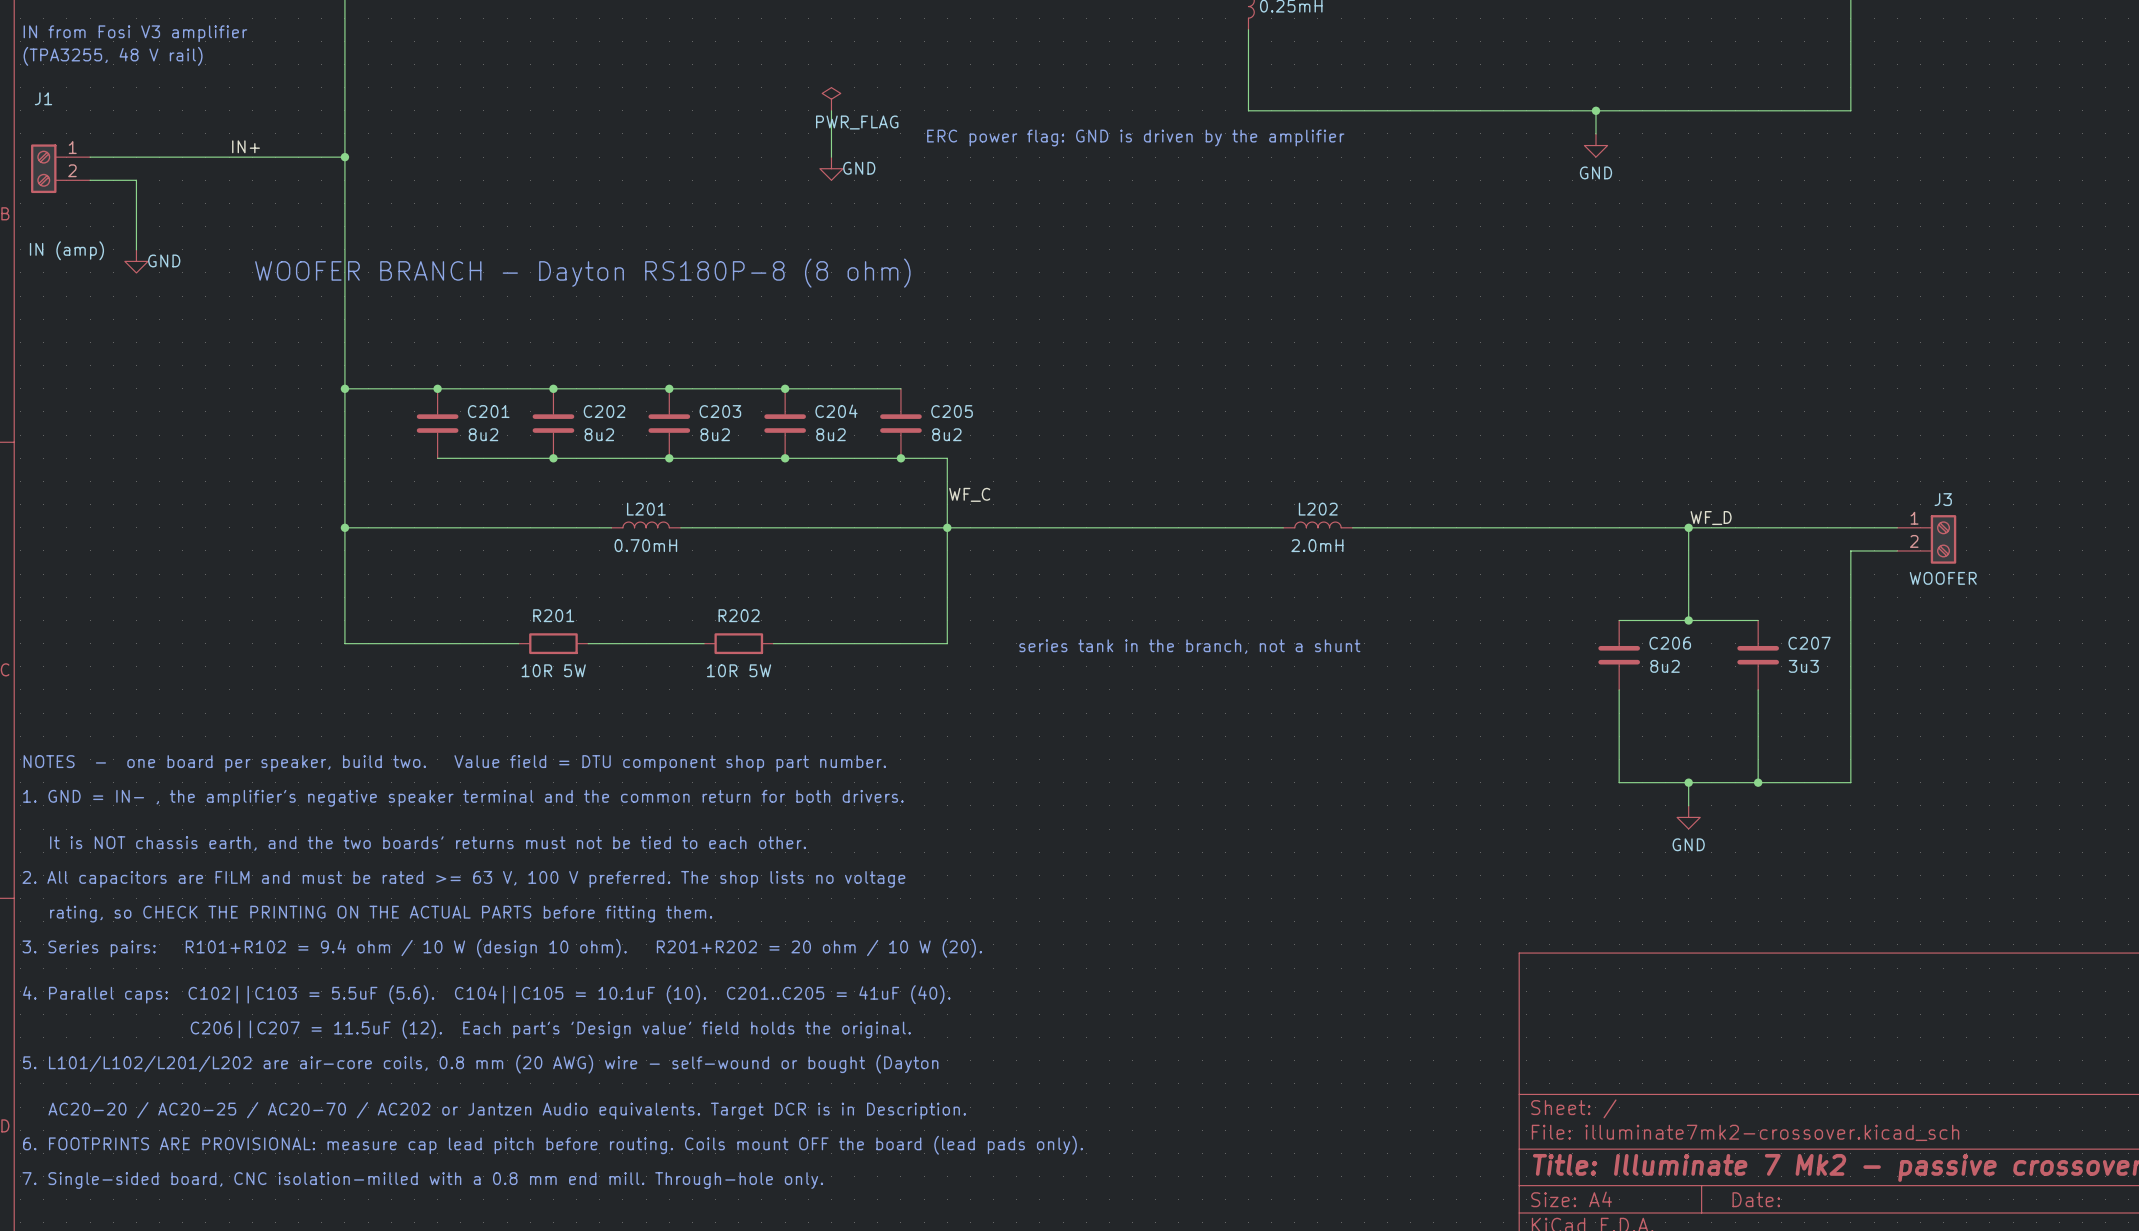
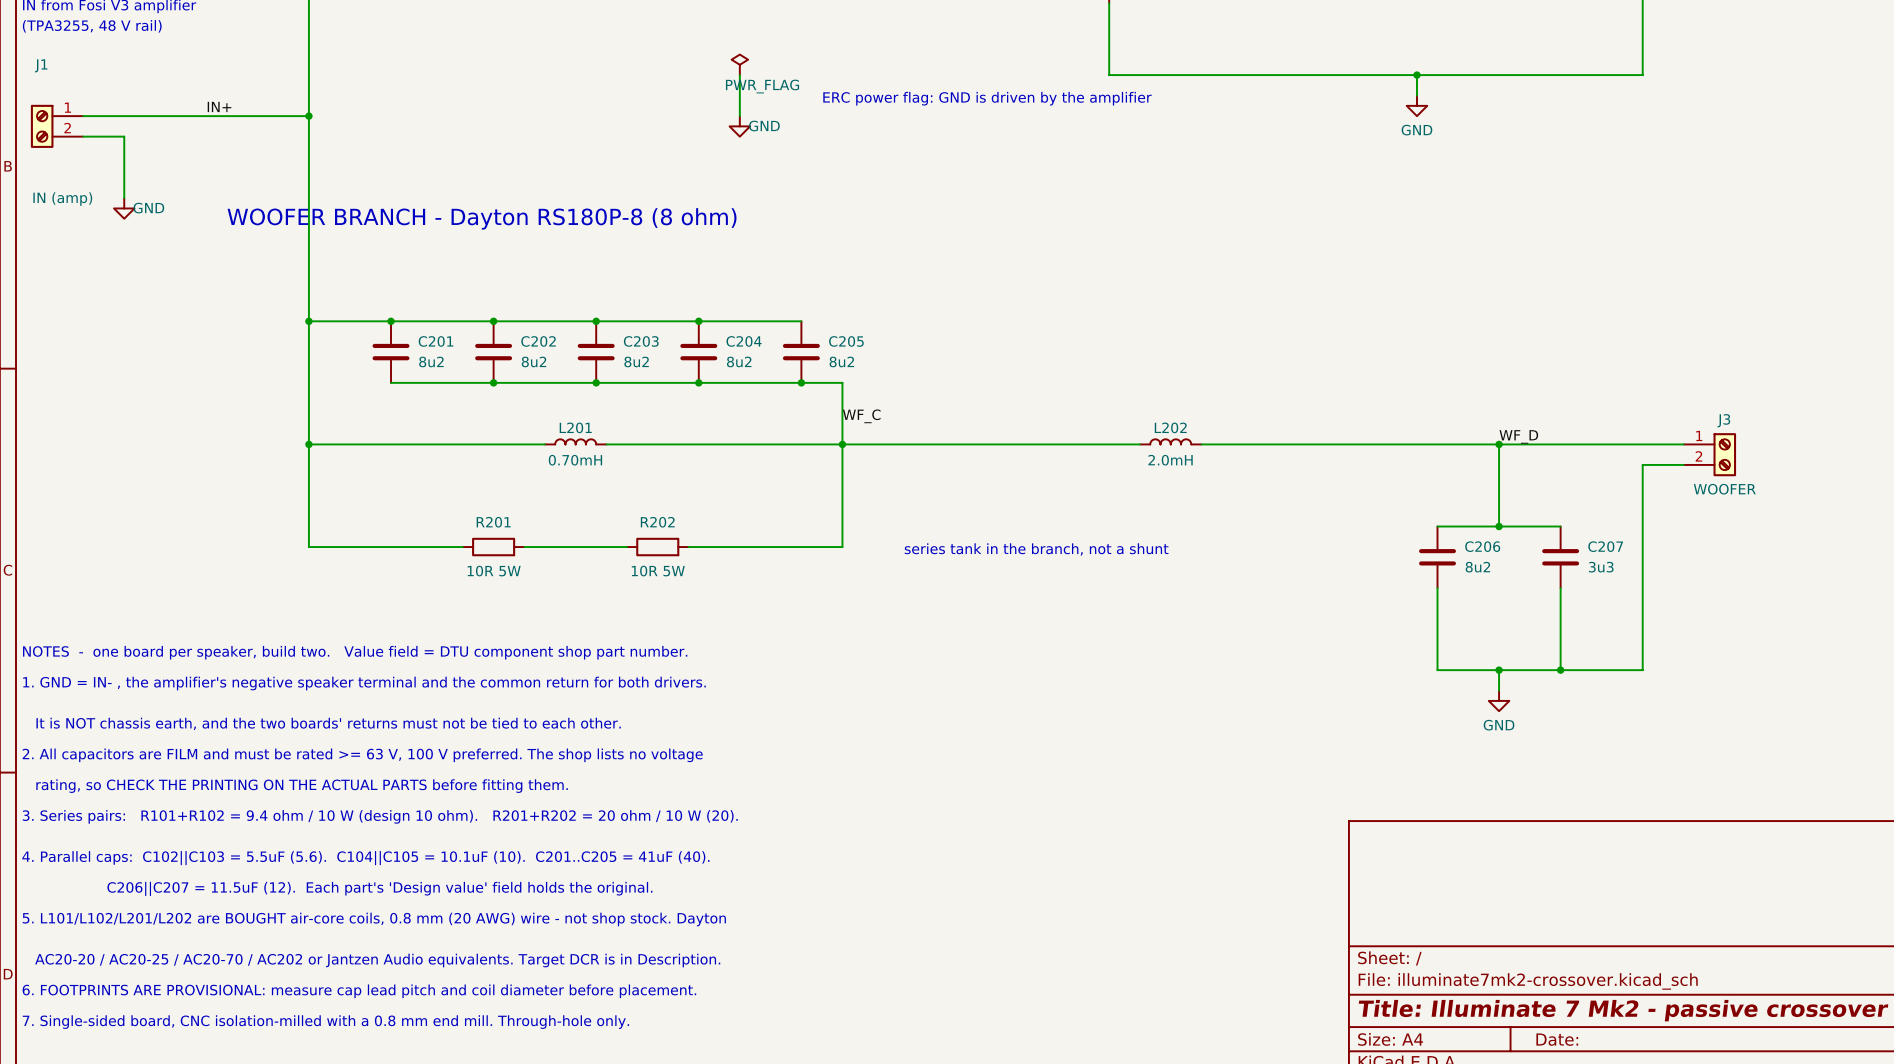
text: 5. L101/L102/L201/L202 are air-core coils, 0.8 mm (20 AWG) wire - self-wound or bought (Dayton (480, 1064) -> 5. L101/L102/L201/L202 are BOUGHT air-core coils, 0.8 mm (20 AWG) wire - not shop stock. Dayton (374, 919)
text: 6. FOOTPRINTS ARE PROVISIONAL: measure cap lead pitch before routing. Coils mount OFF the board (lead pads only). (552, 1145) -> 6. FOOTPRINTS ARE PROVISIONAL: measure cap lead pitch and coil diameter before placement. (359, 991)

